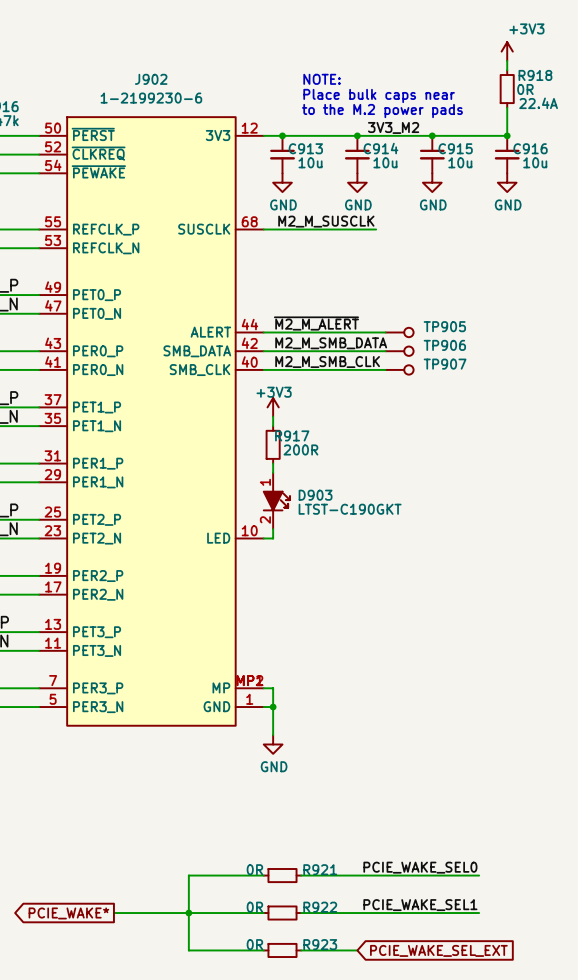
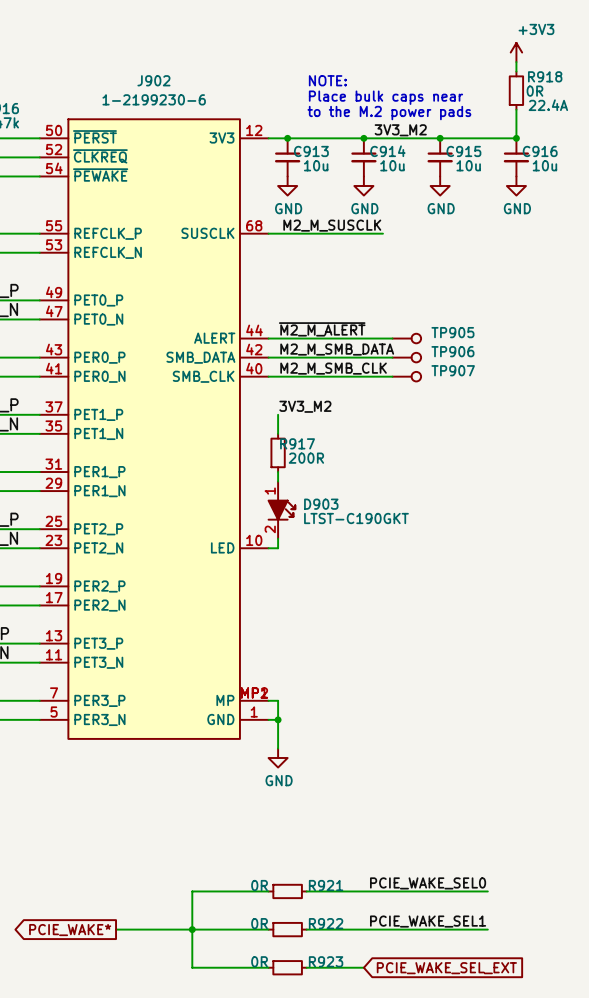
label: none -> 3V3_M2 (305, 406)
power symbol: +3V3 (273, 407) -> none

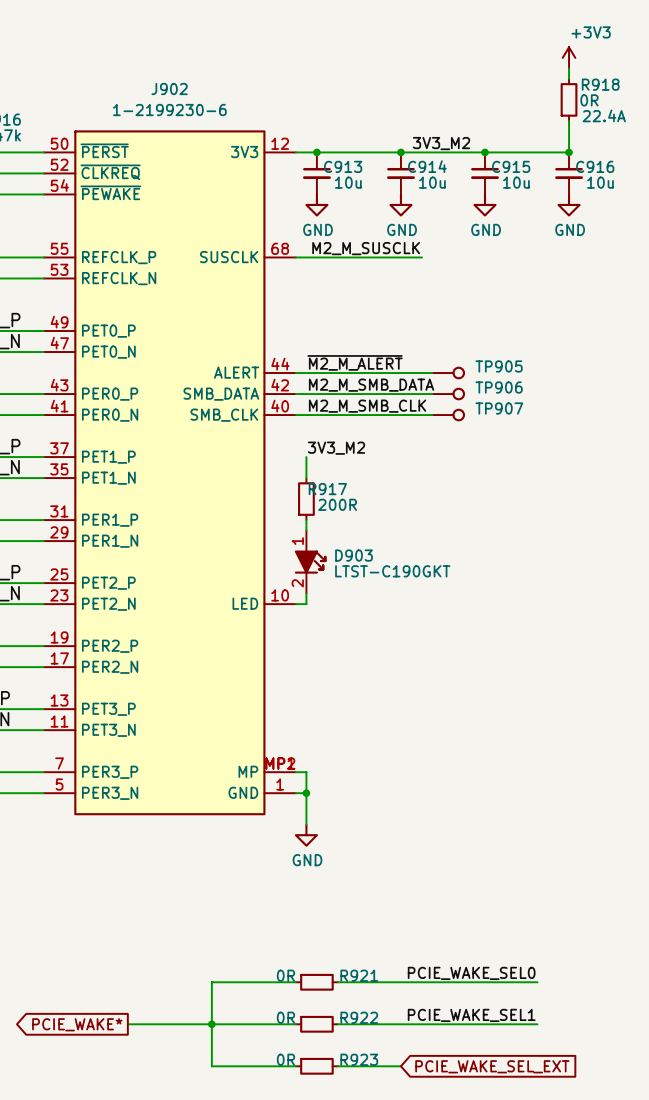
text: NOTE: (327, 80) -> none
text: Place bulk caps near (385, 97) -> none
text: to the M.2 power pads (389, 113) -> none

